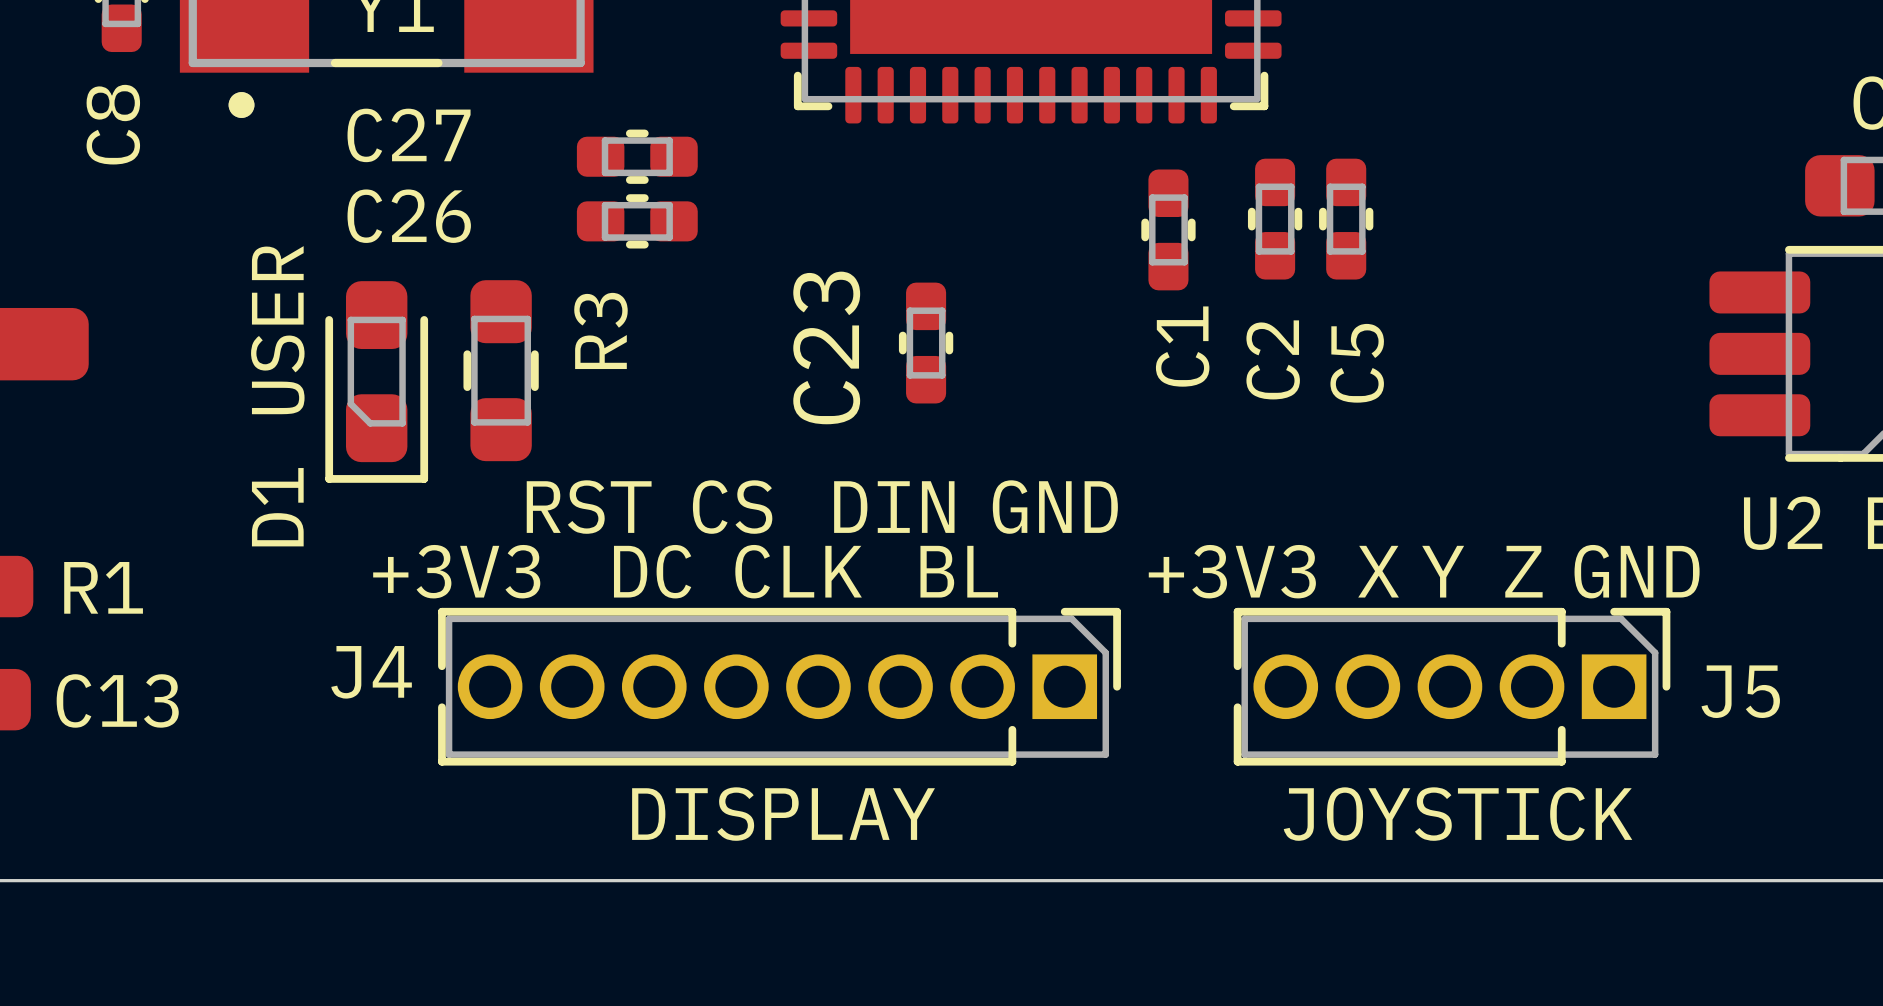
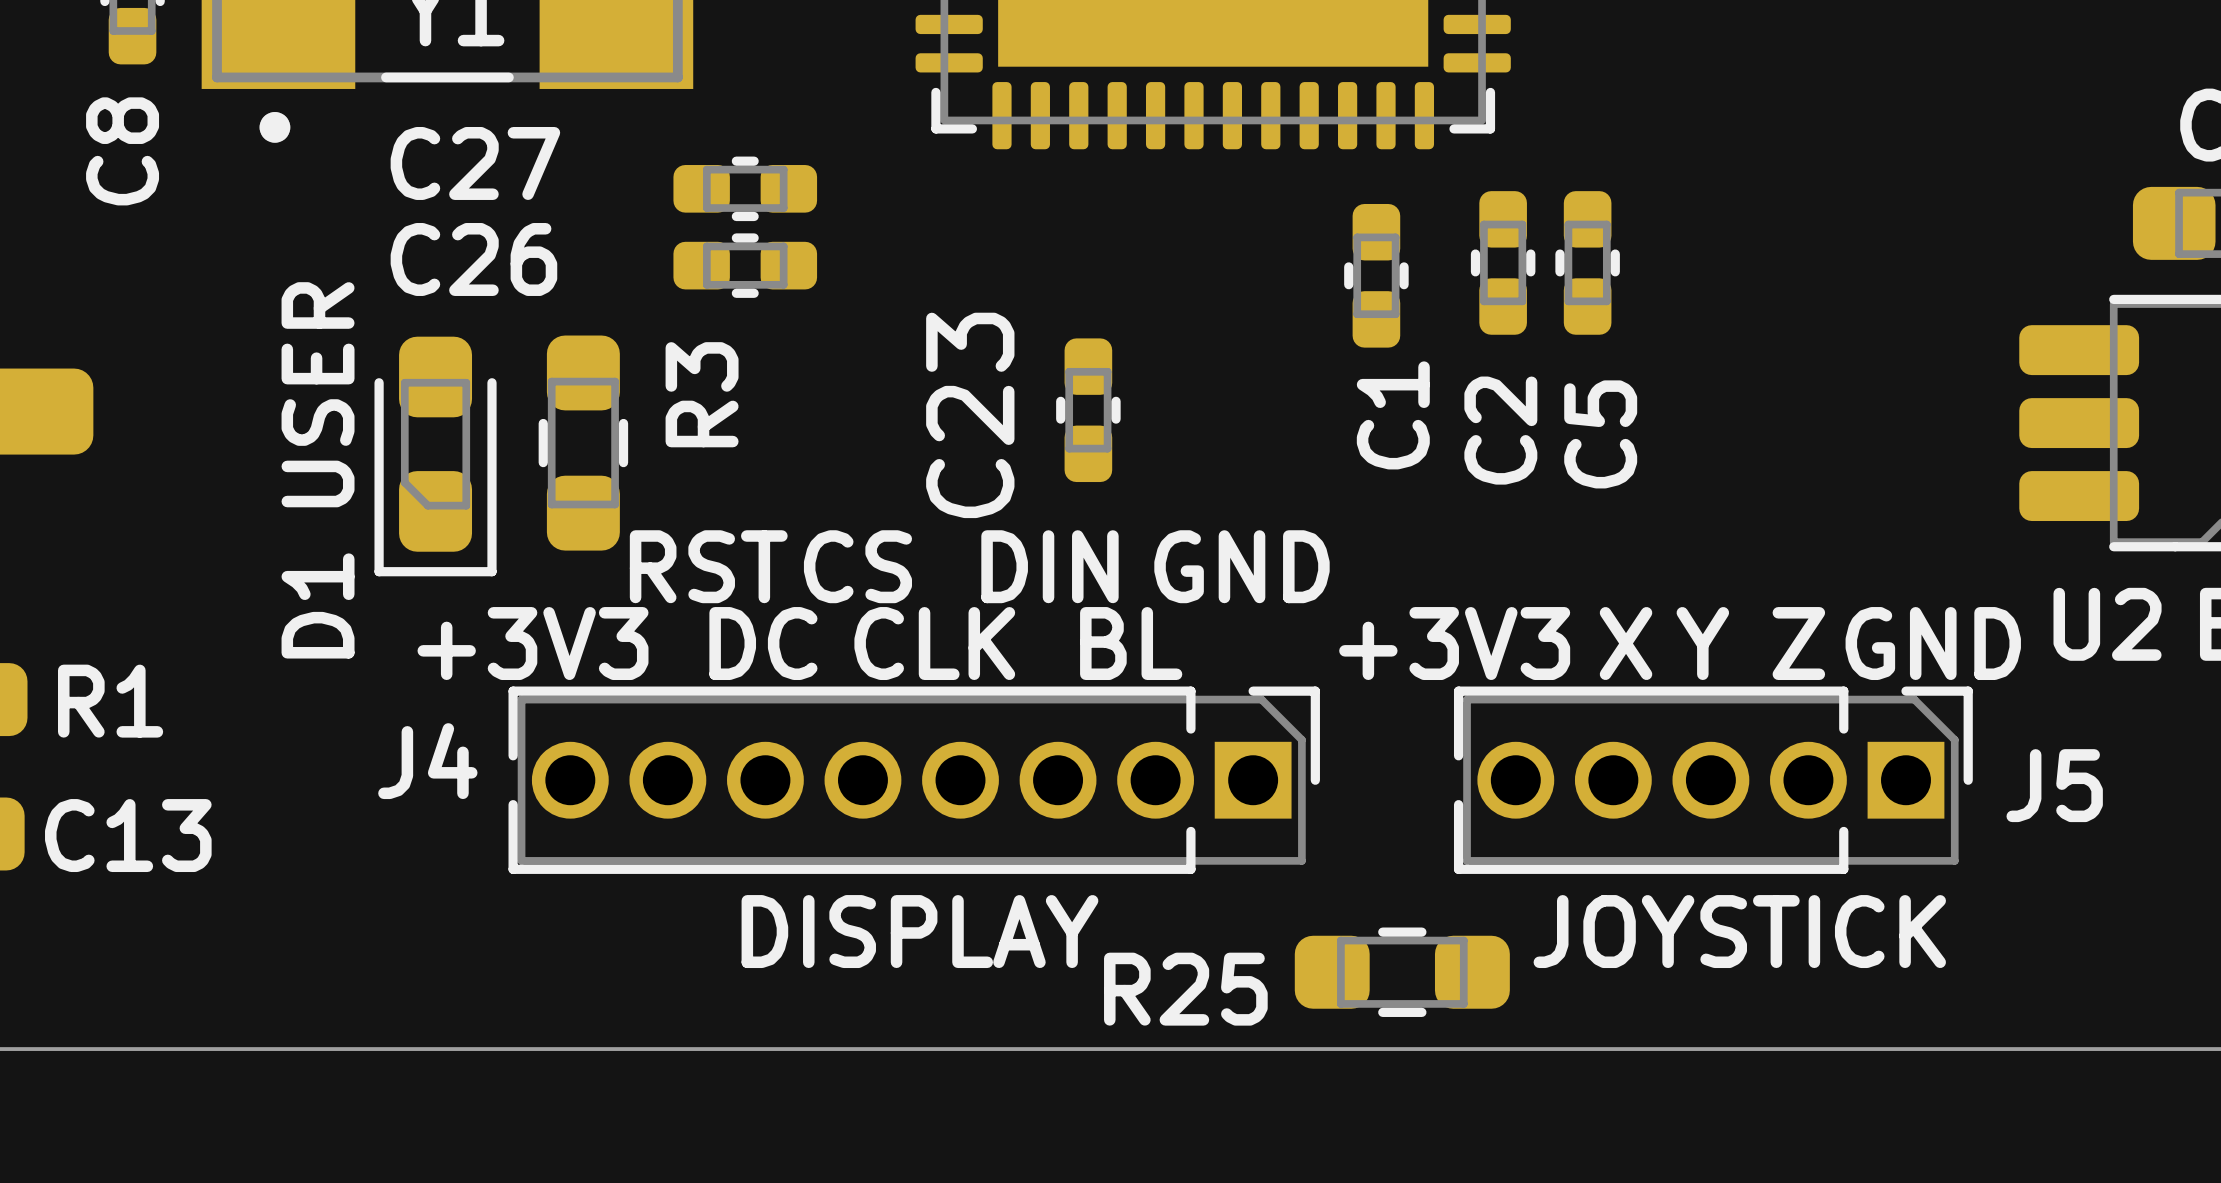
text position: RST (589, 507) -> RST (708, 566)
text position: CS (732, 507) -> CS (857, 566)
text position: DIN (894, 507) -> DIN (1049, 566)
text position: GND (1055, 507) -> GND (1242, 566)
text position: +3V3 (456, 571) -> +3V3 (533, 643)
text position: DC (652, 571) -> DC (763, 643)
text position: CLK (798, 571) -> CLK (934, 643)
text position: BL (959, 571) -> BL (1131, 643)
text position: +3V3 (1232, 571) -> +3V3 (1454, 643)
text position: X (1378, 571) -> X (1626, 643)
text position: Y (1443, 571) -> Y (1702, 643)
text position: Z (1523, 571) -> Z (1798, 643)
text position: GND (1637, 571) -> GND (1933, 643)
J4 position: (779, 686) -> (914, 780)
J5 position: (1452, 686) -> (1713, 780)
text position: DISPLAY (783, 814) -> DISPLAY (919, 931)
text position: JOYSTICK (1458, 814) -> JOYSTICK (1739, 931)
R25: none -> (1402, 972)

